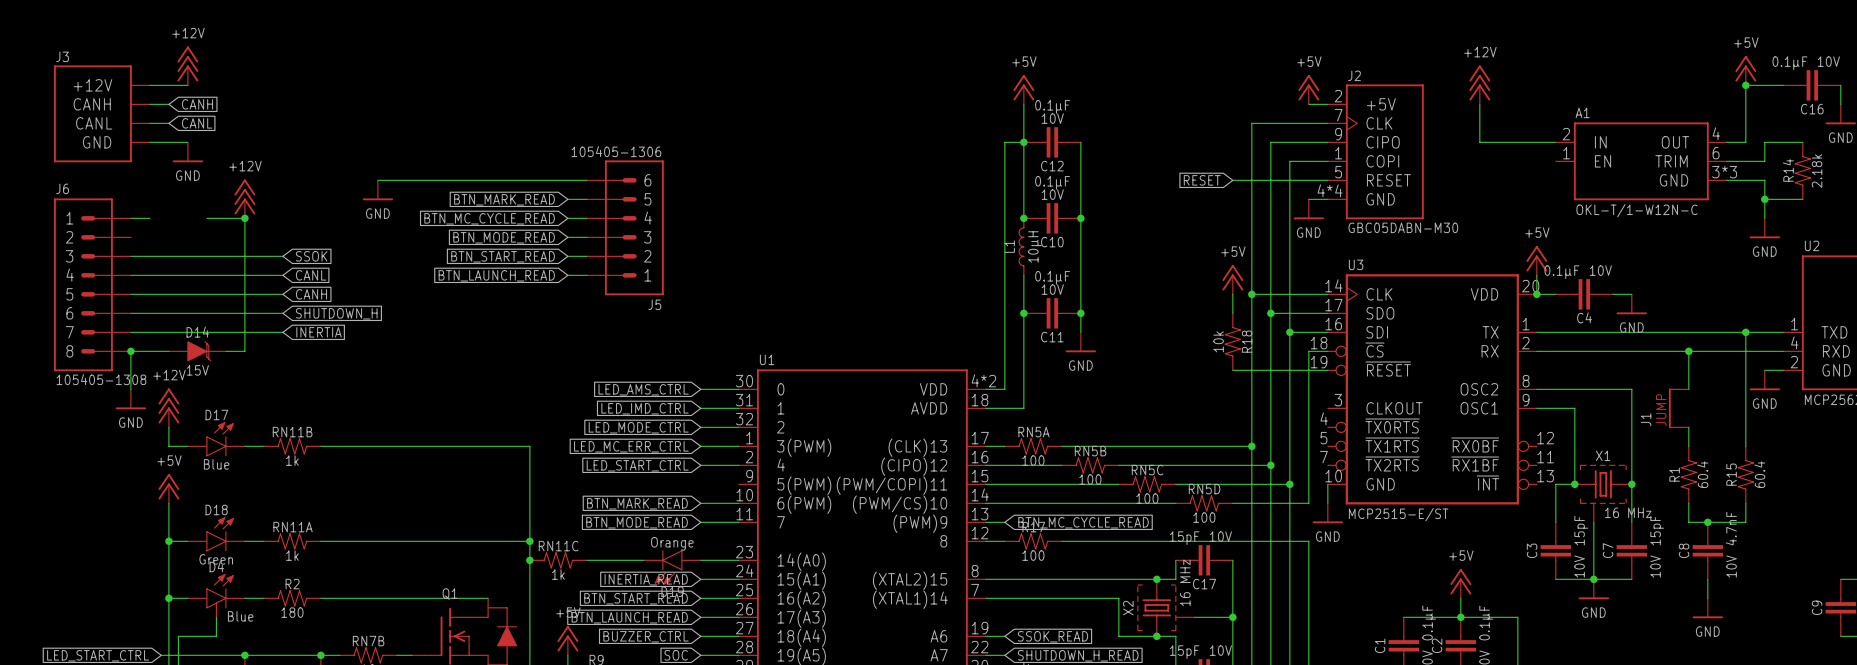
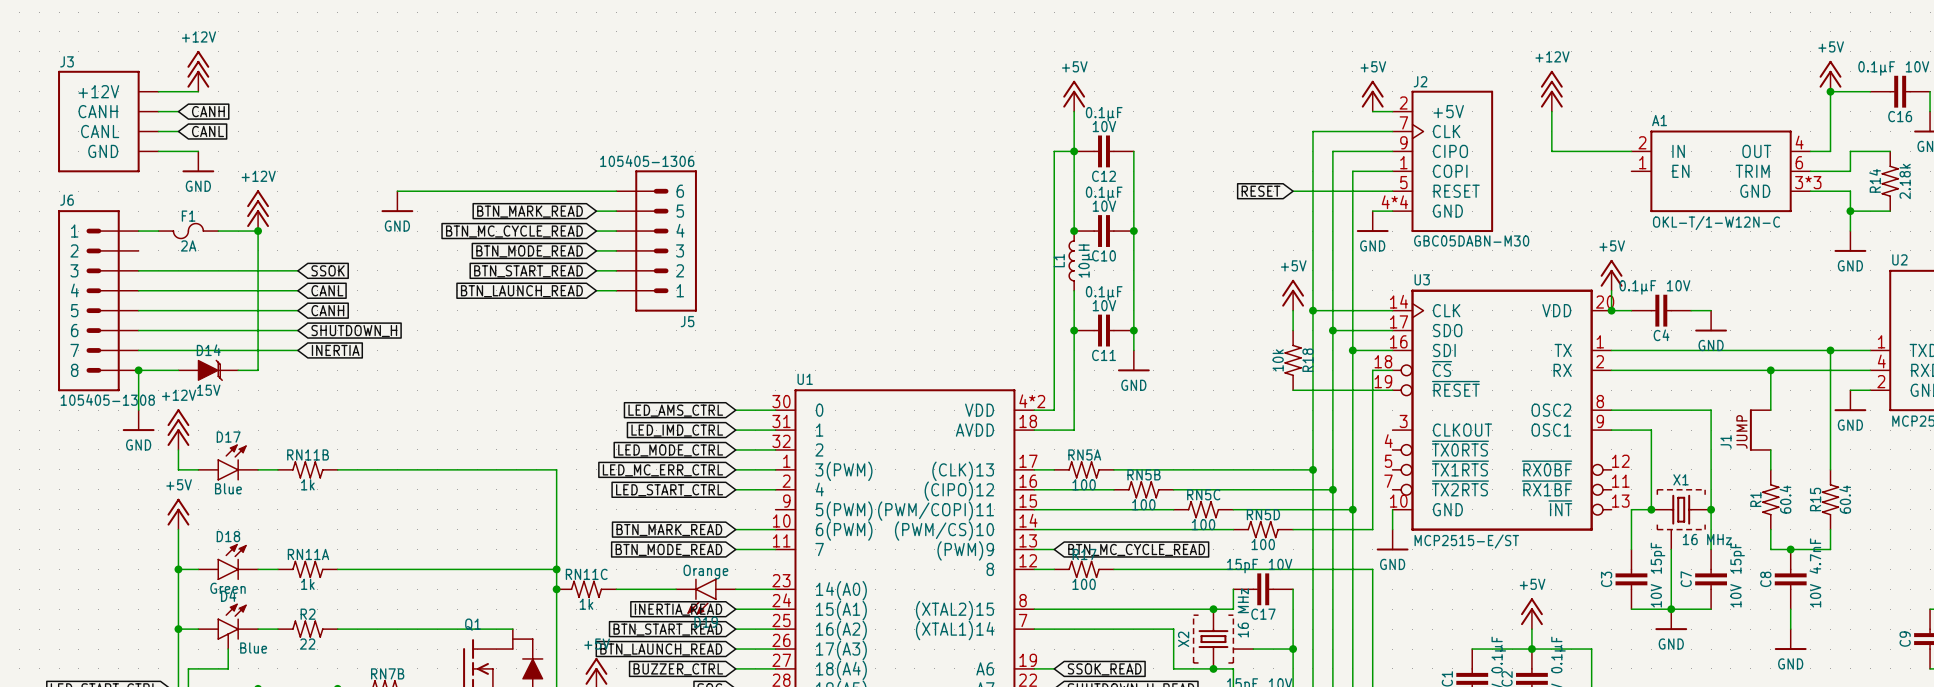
F1: none -> (188, 231)
R2 text: 180 (292, 612) -> 22 (307, 644)

